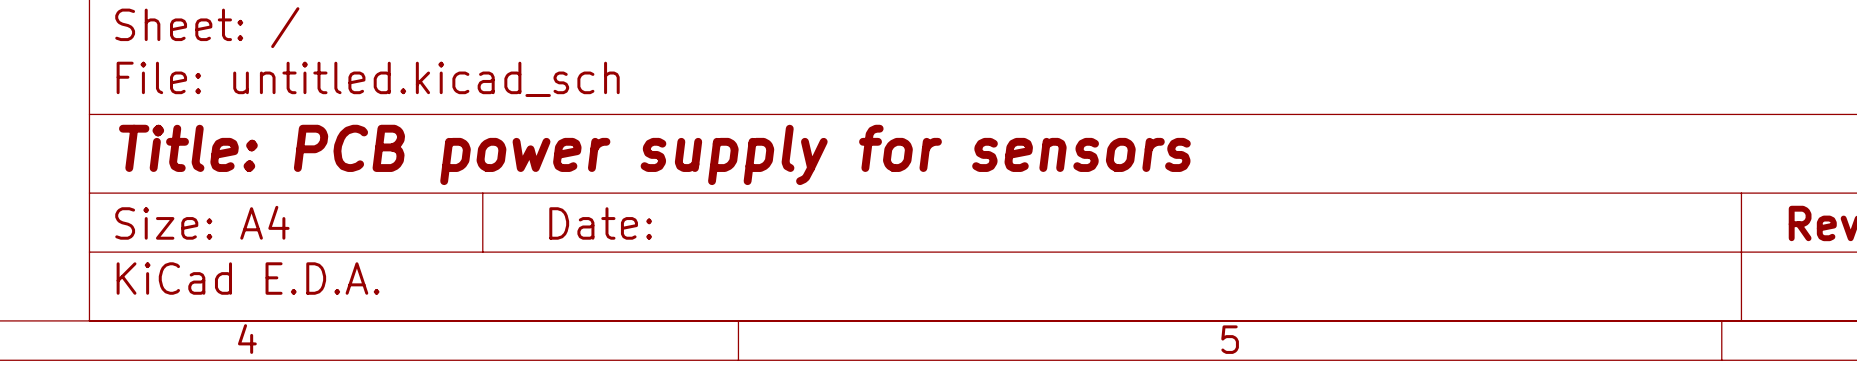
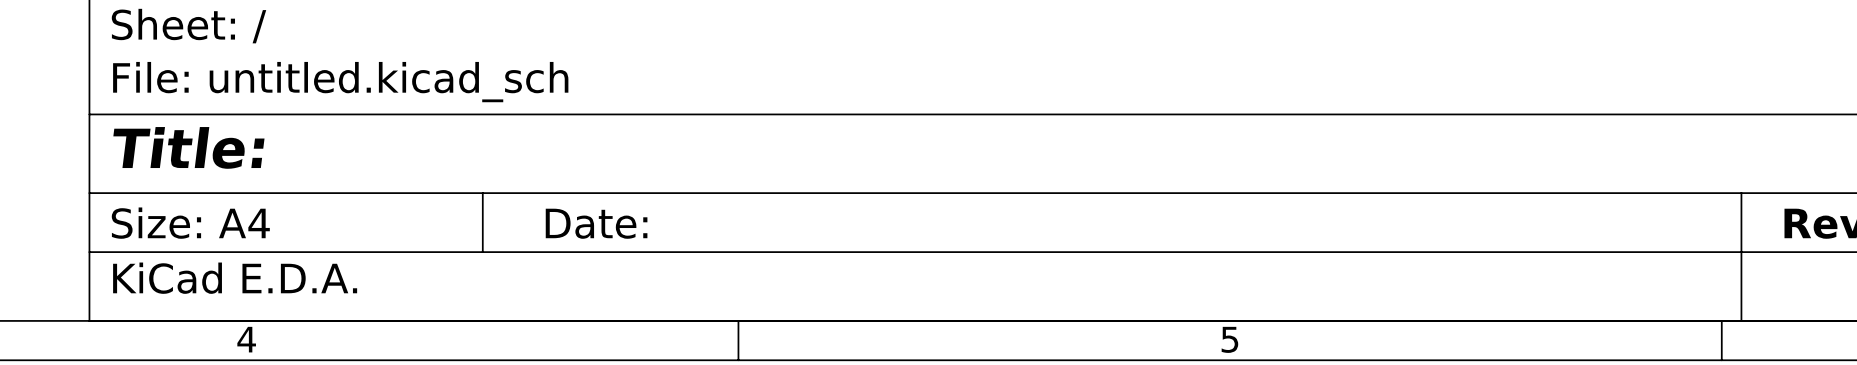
title block: Title: PCB power supply for sensors (654, 154) -> Title: (188, 147)

